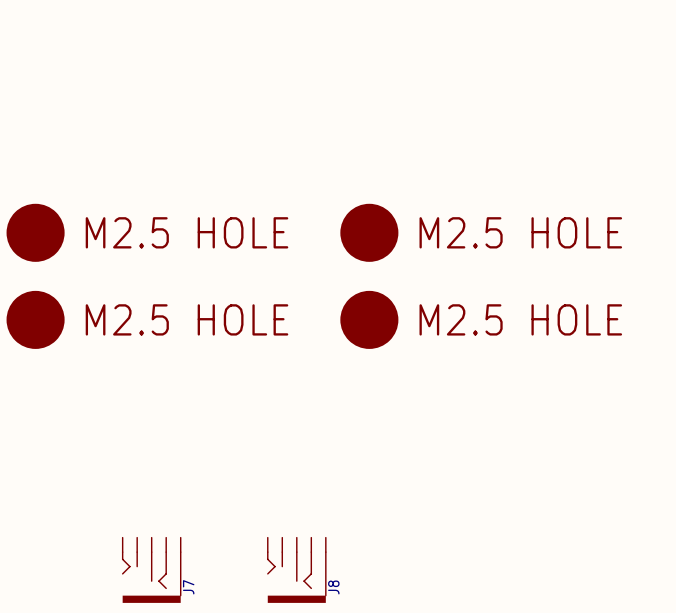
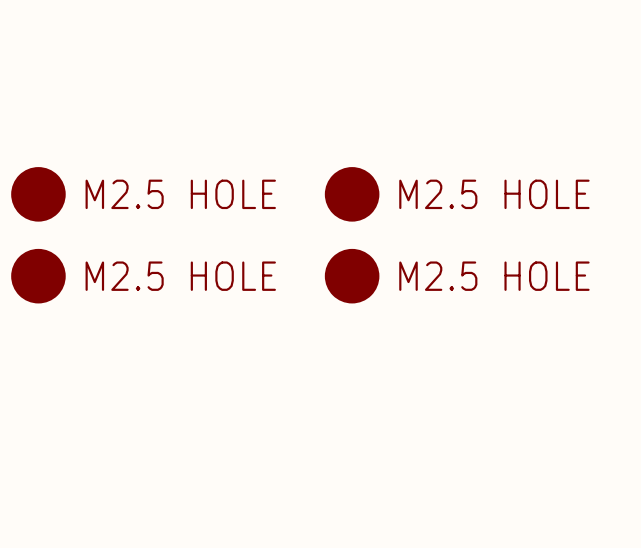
J7: (151, 570) -> none
J8: (296, 570) -> none

